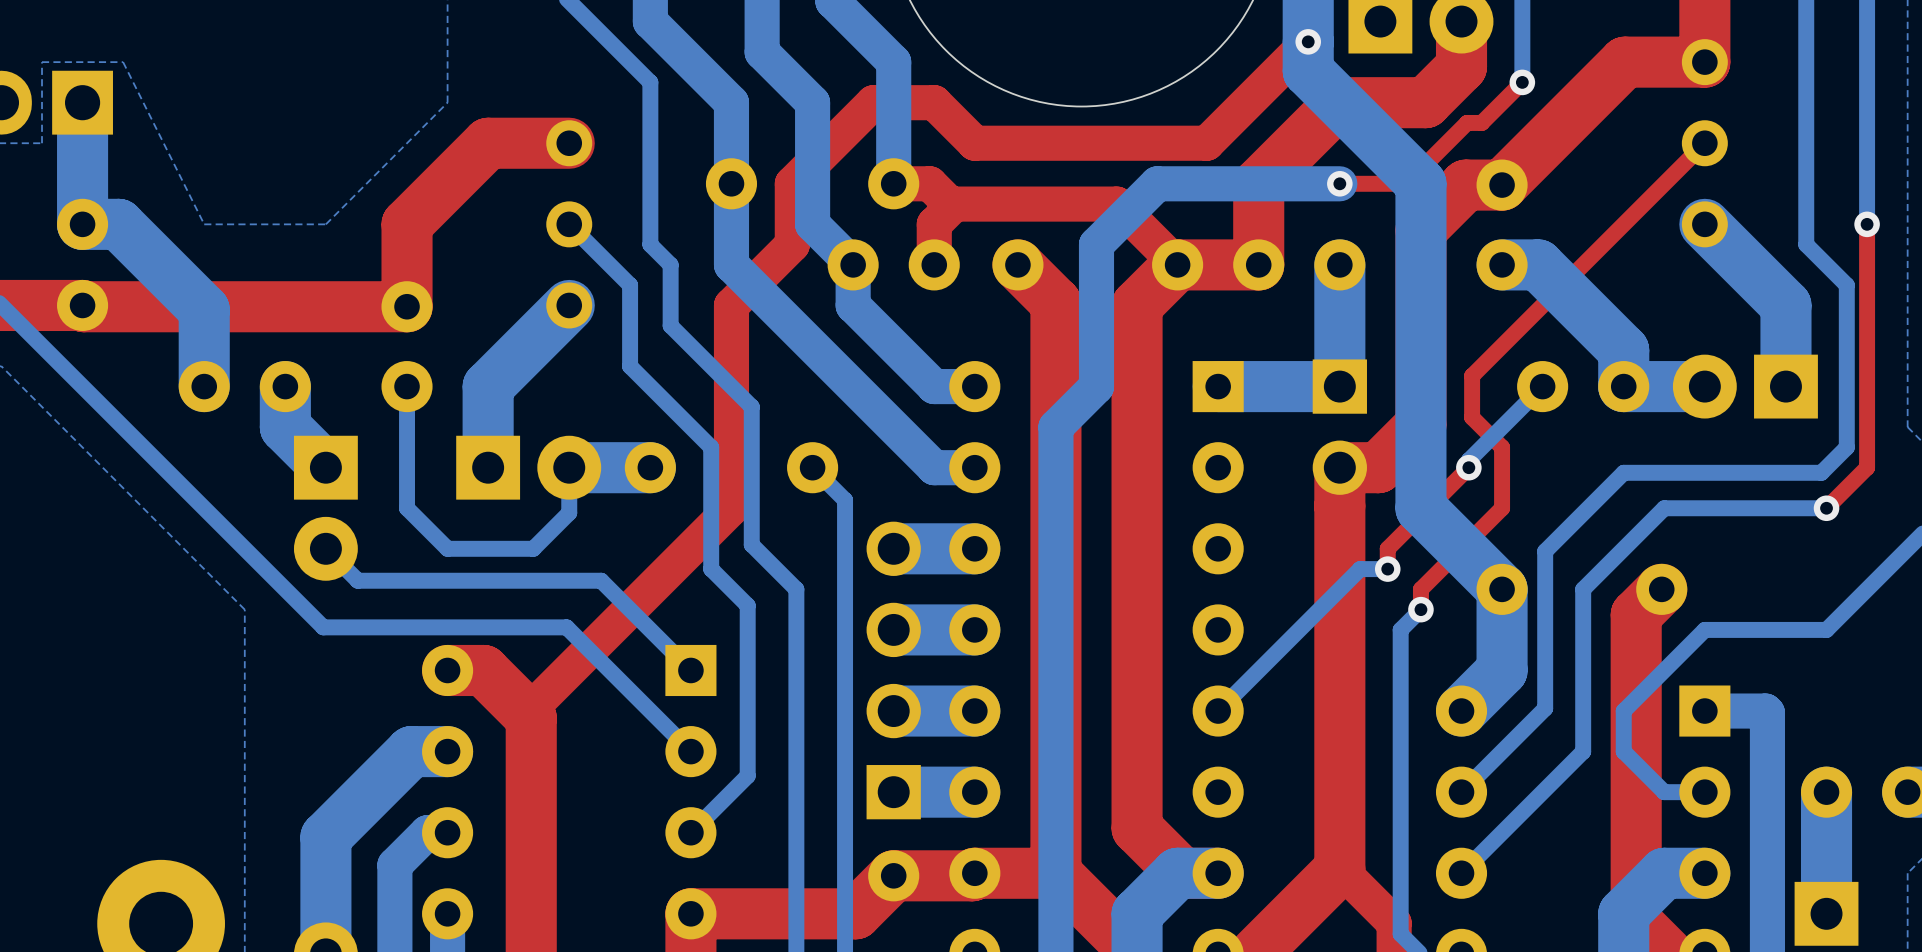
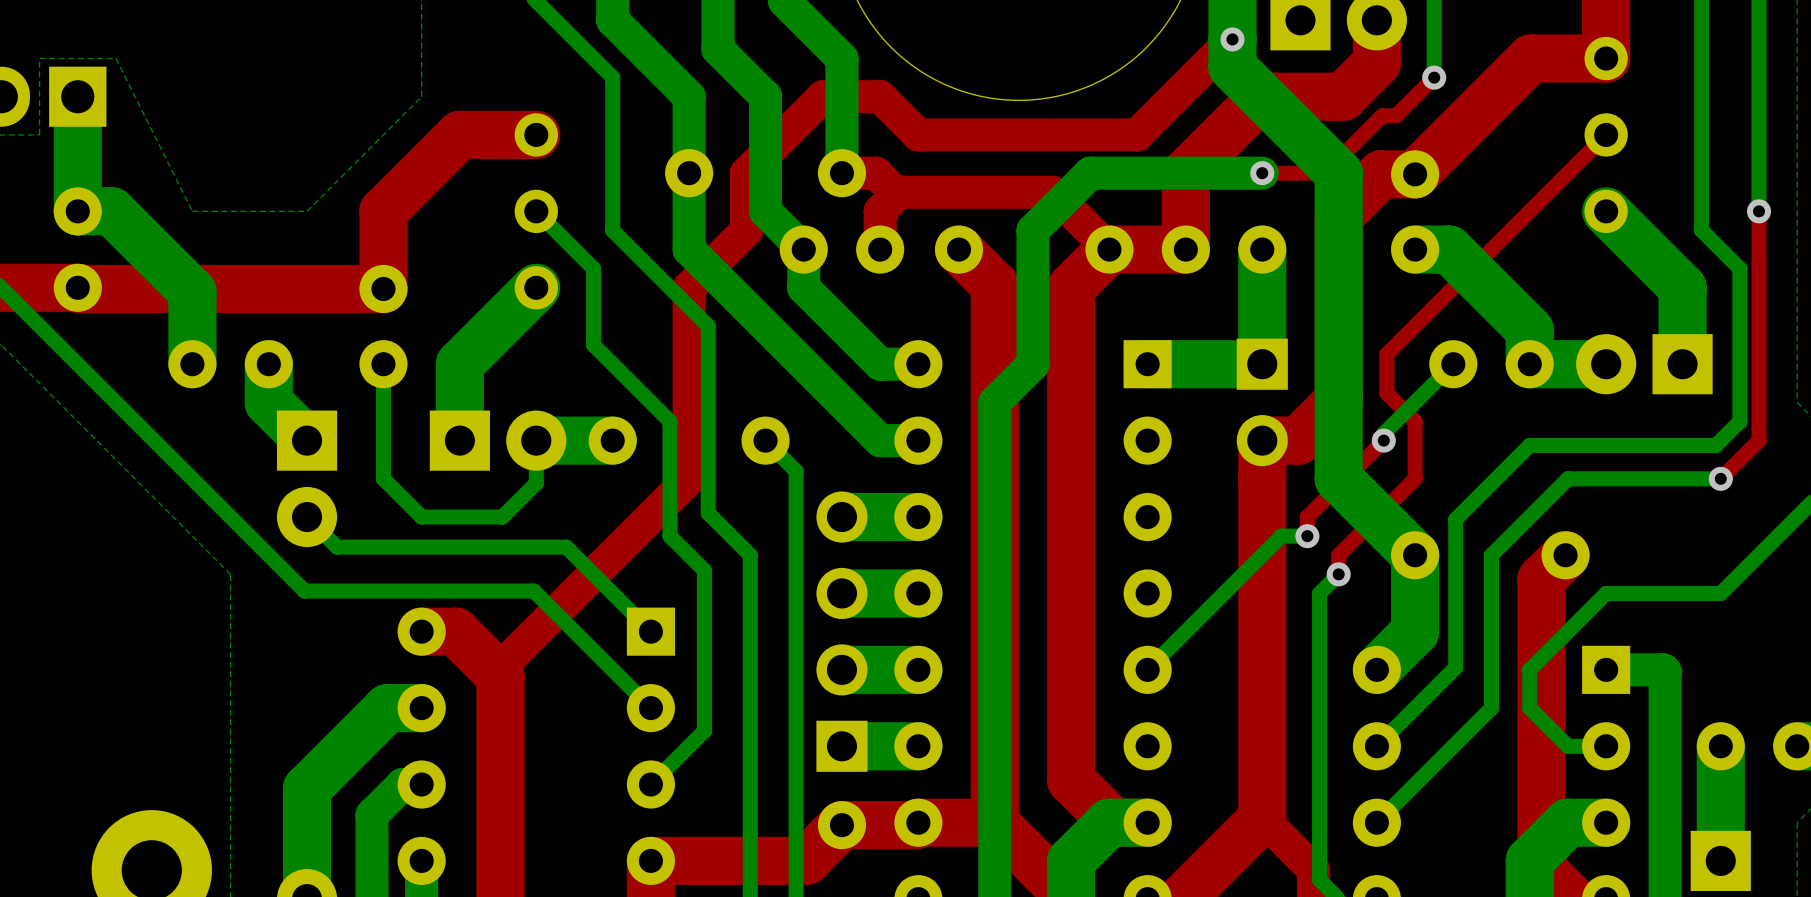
bottom track: (670, 264) (670, 325) (751, 406) -> (631, 249) (708, 325) (708, 383)

